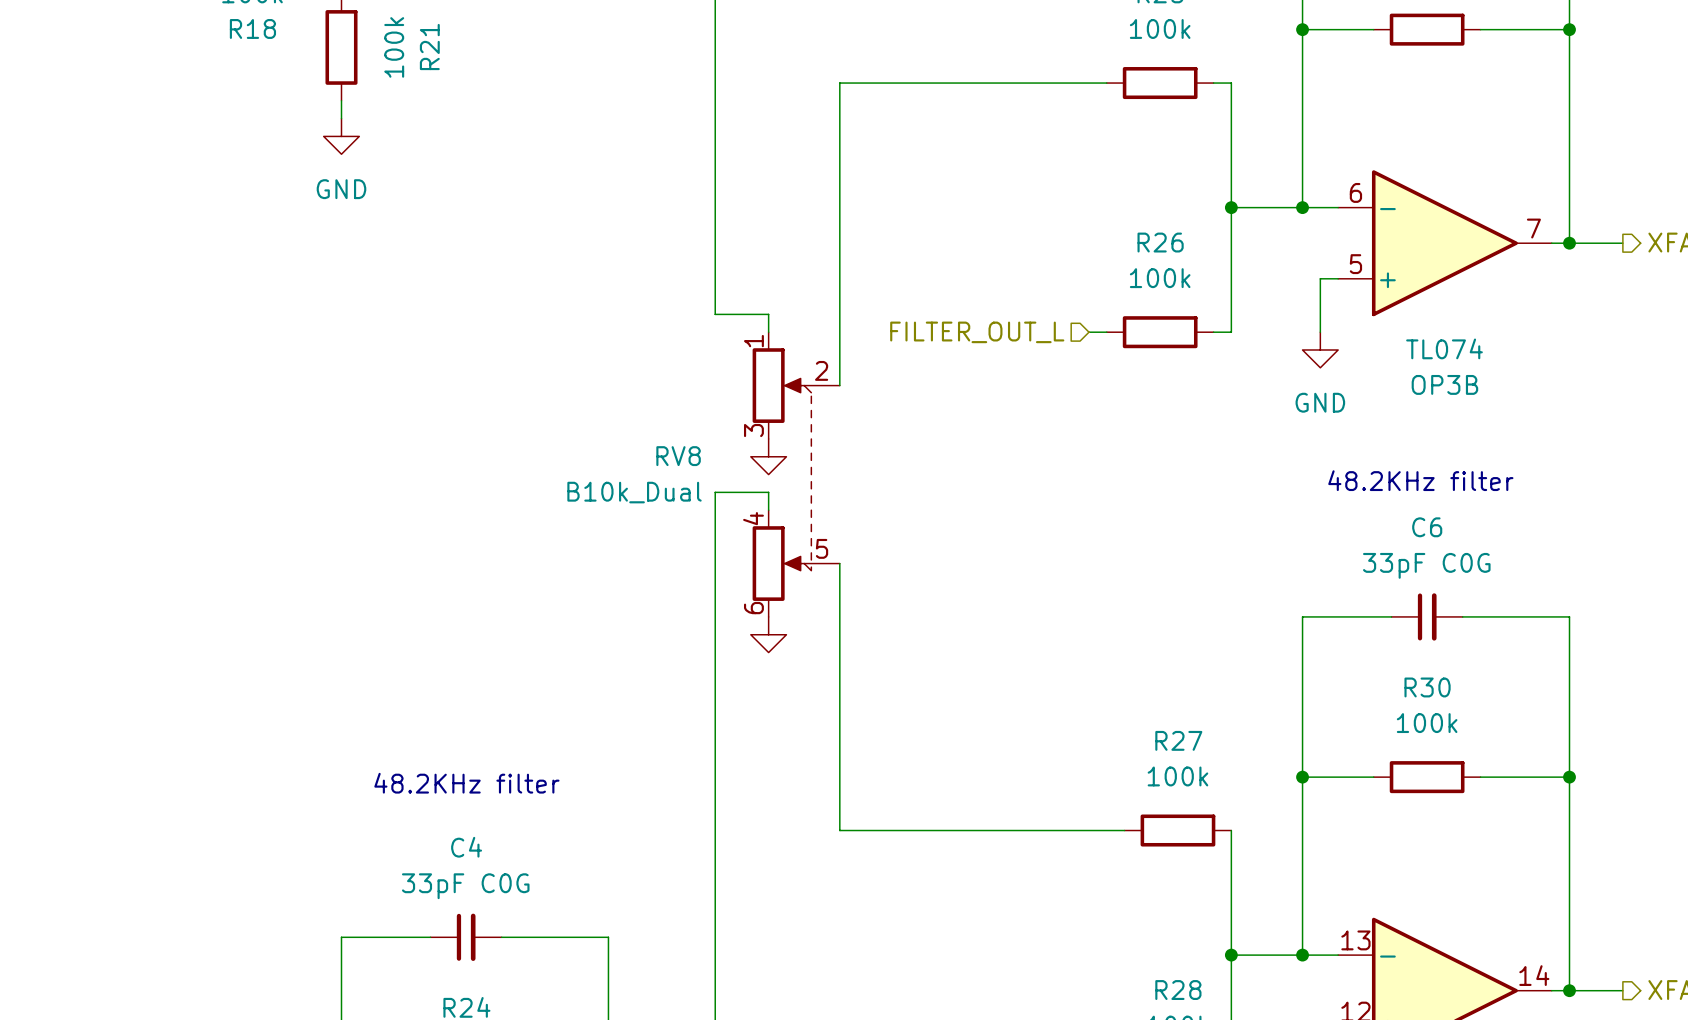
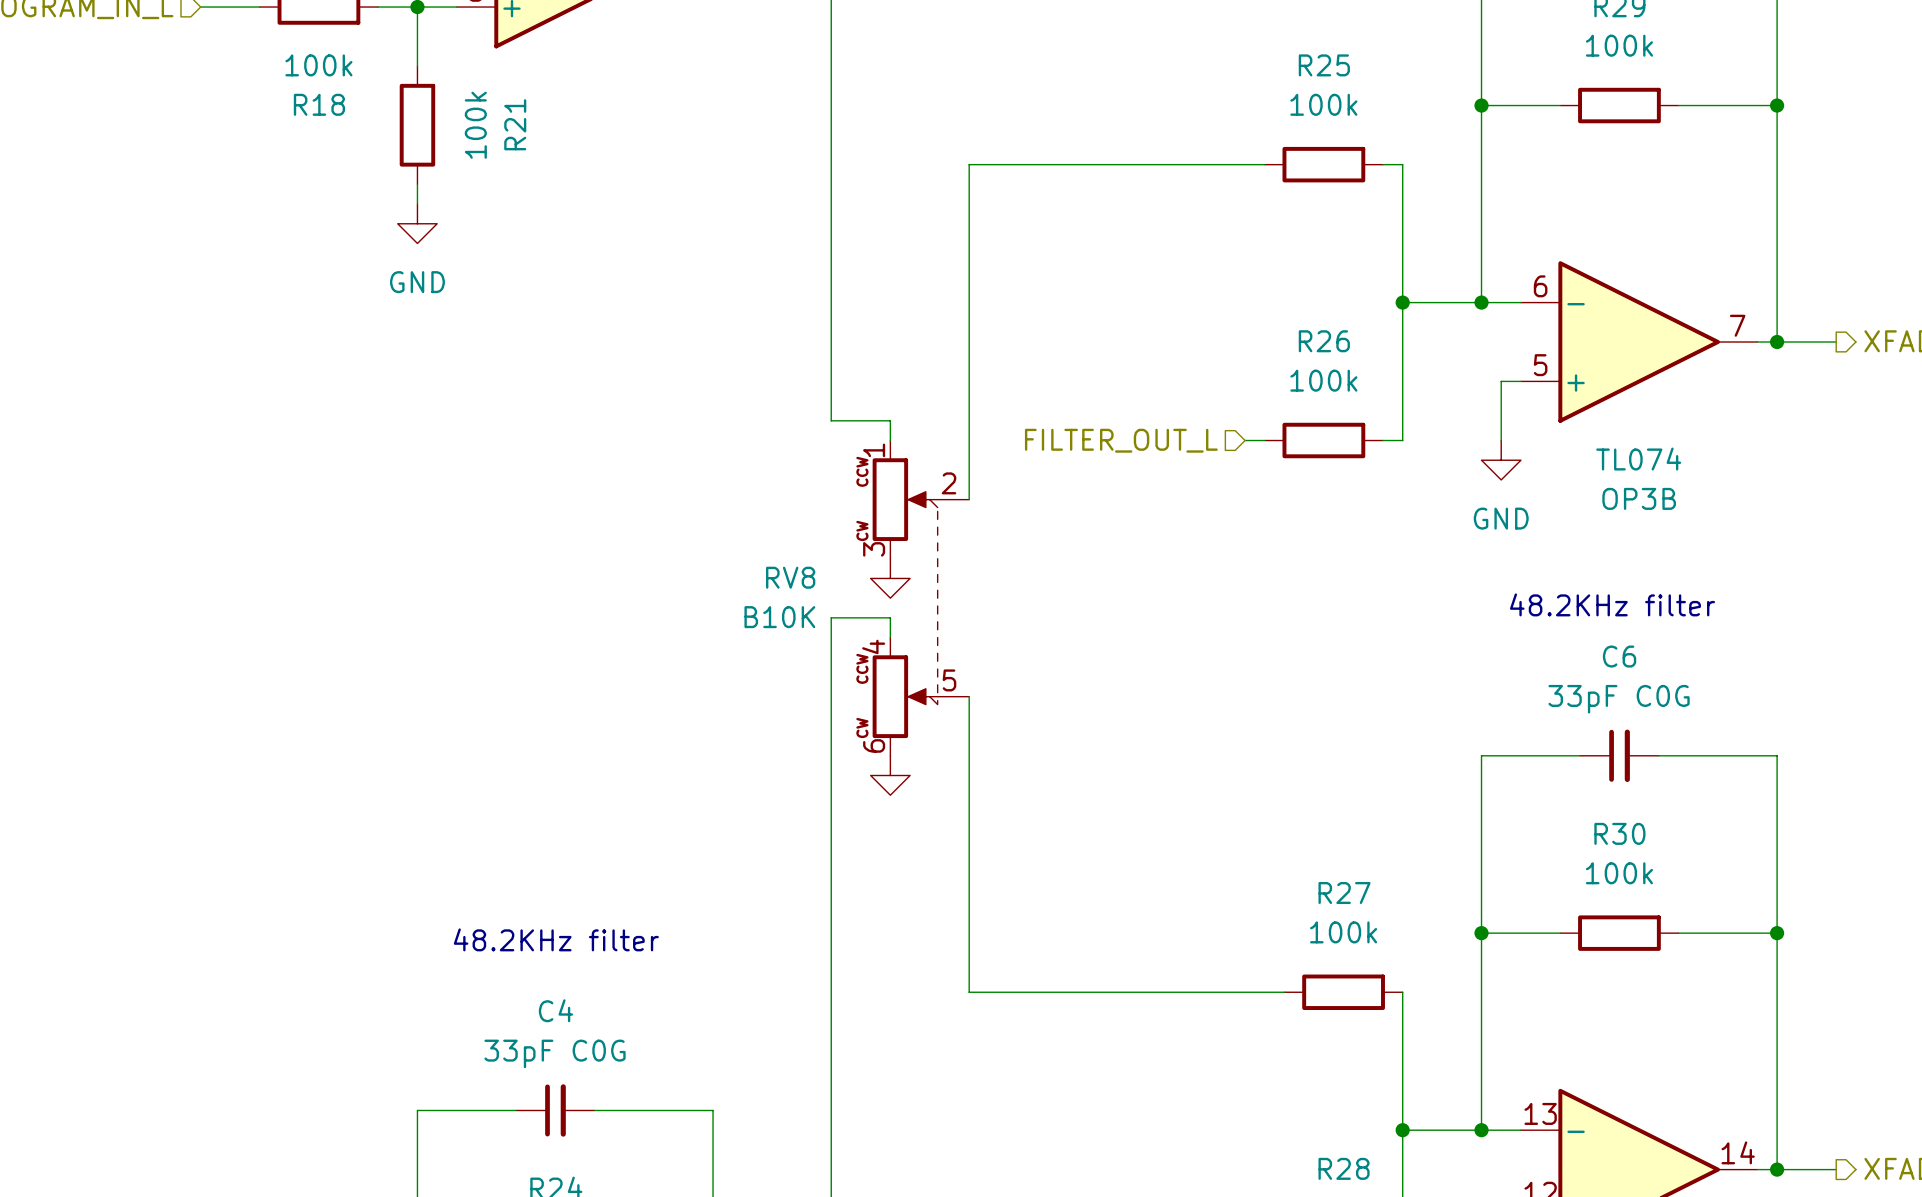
RV8 text: none -> CCW (862, 471)
RV8 text: none -> CW (862, 530)
RV8 value: B10k_Dual (634, 492) -> B10K (779, 617)
RV8 text: none -> CCW (862, 668)
RV8 text: none -> CW (862, 727)

